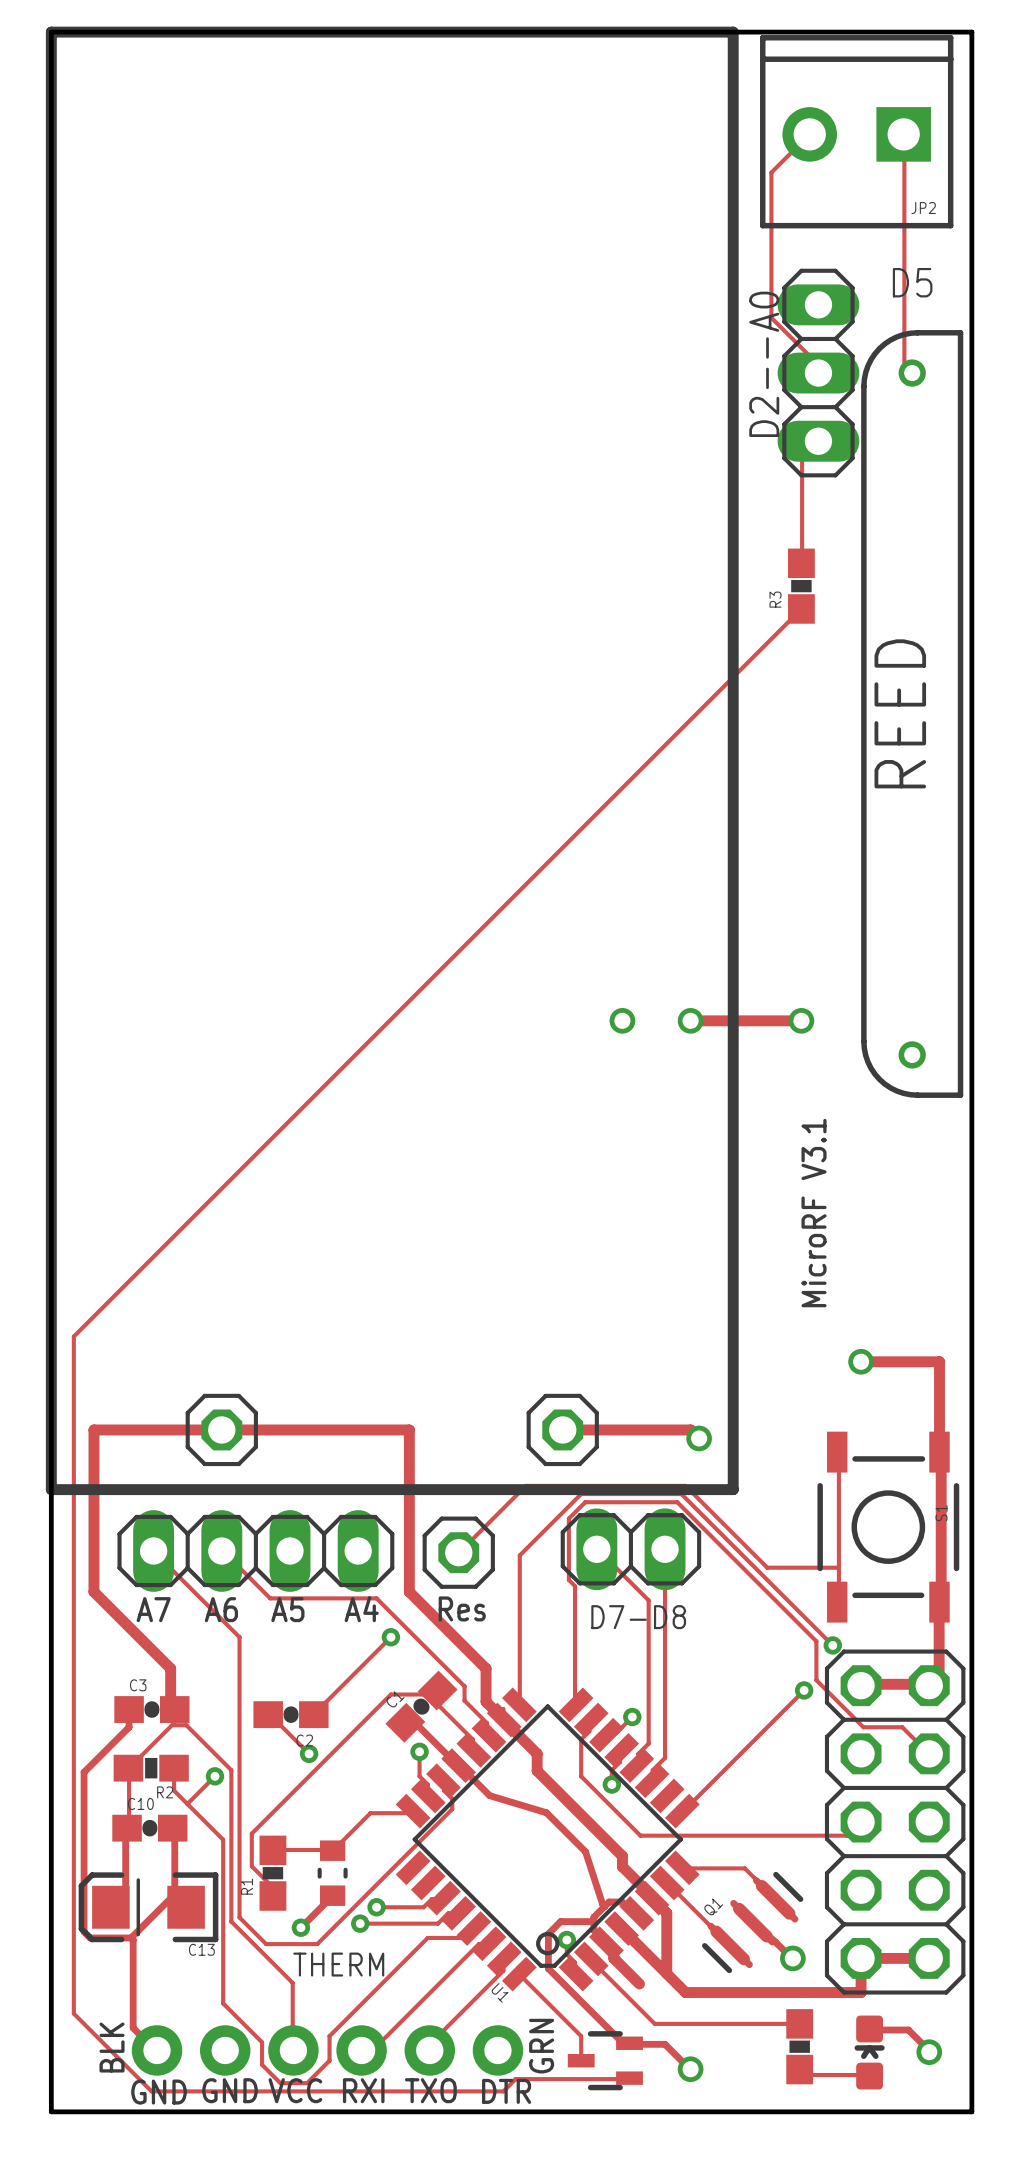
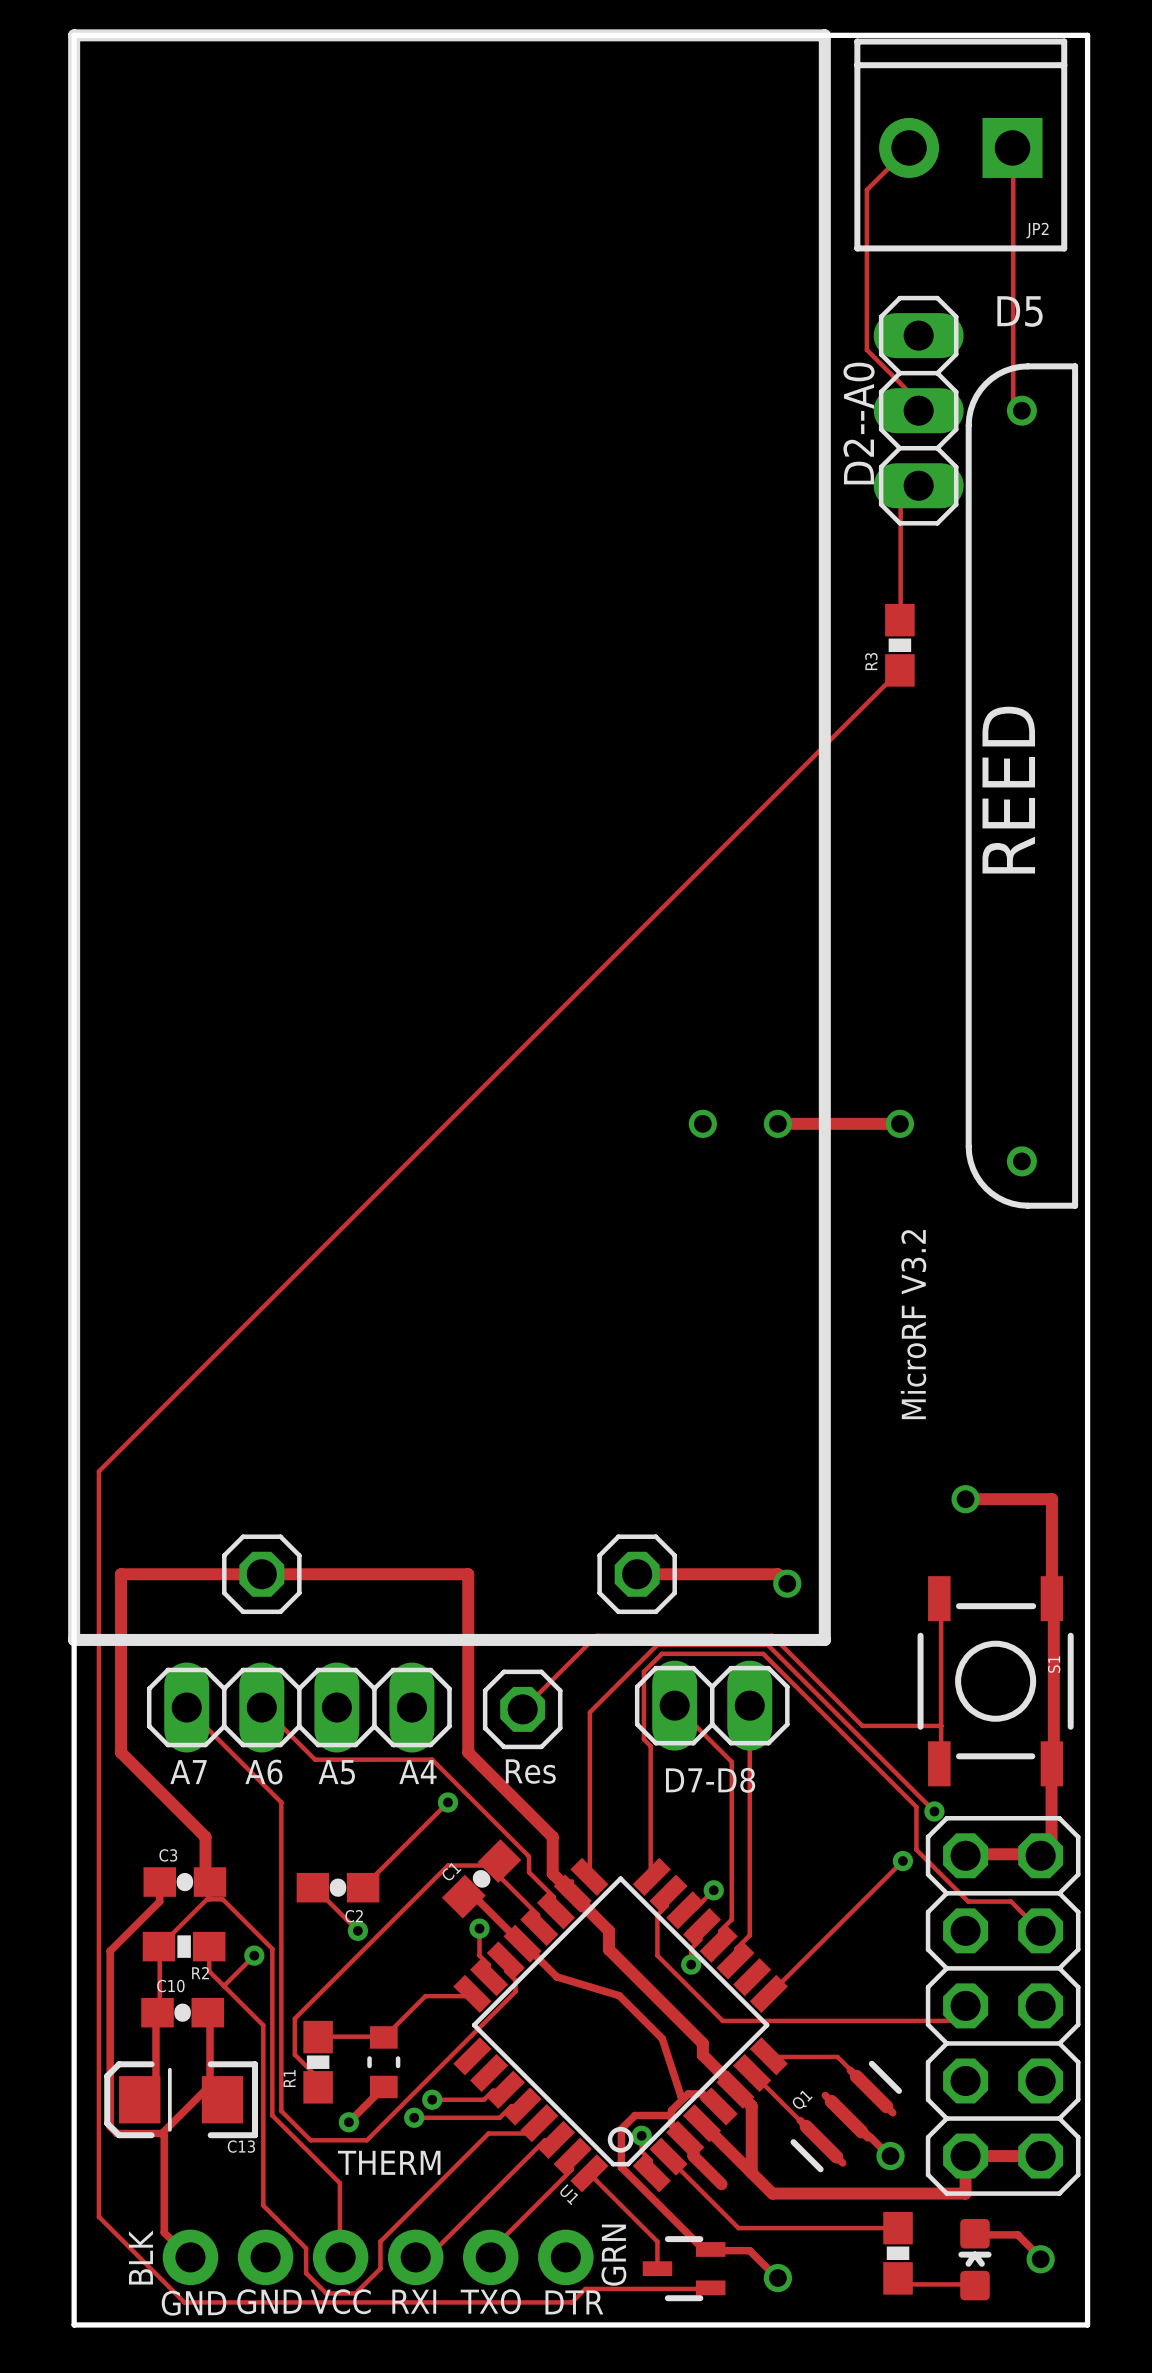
text: MicroRF V3.1 (814, 1213) -> MicroRF V3.2 (913, 1324)

